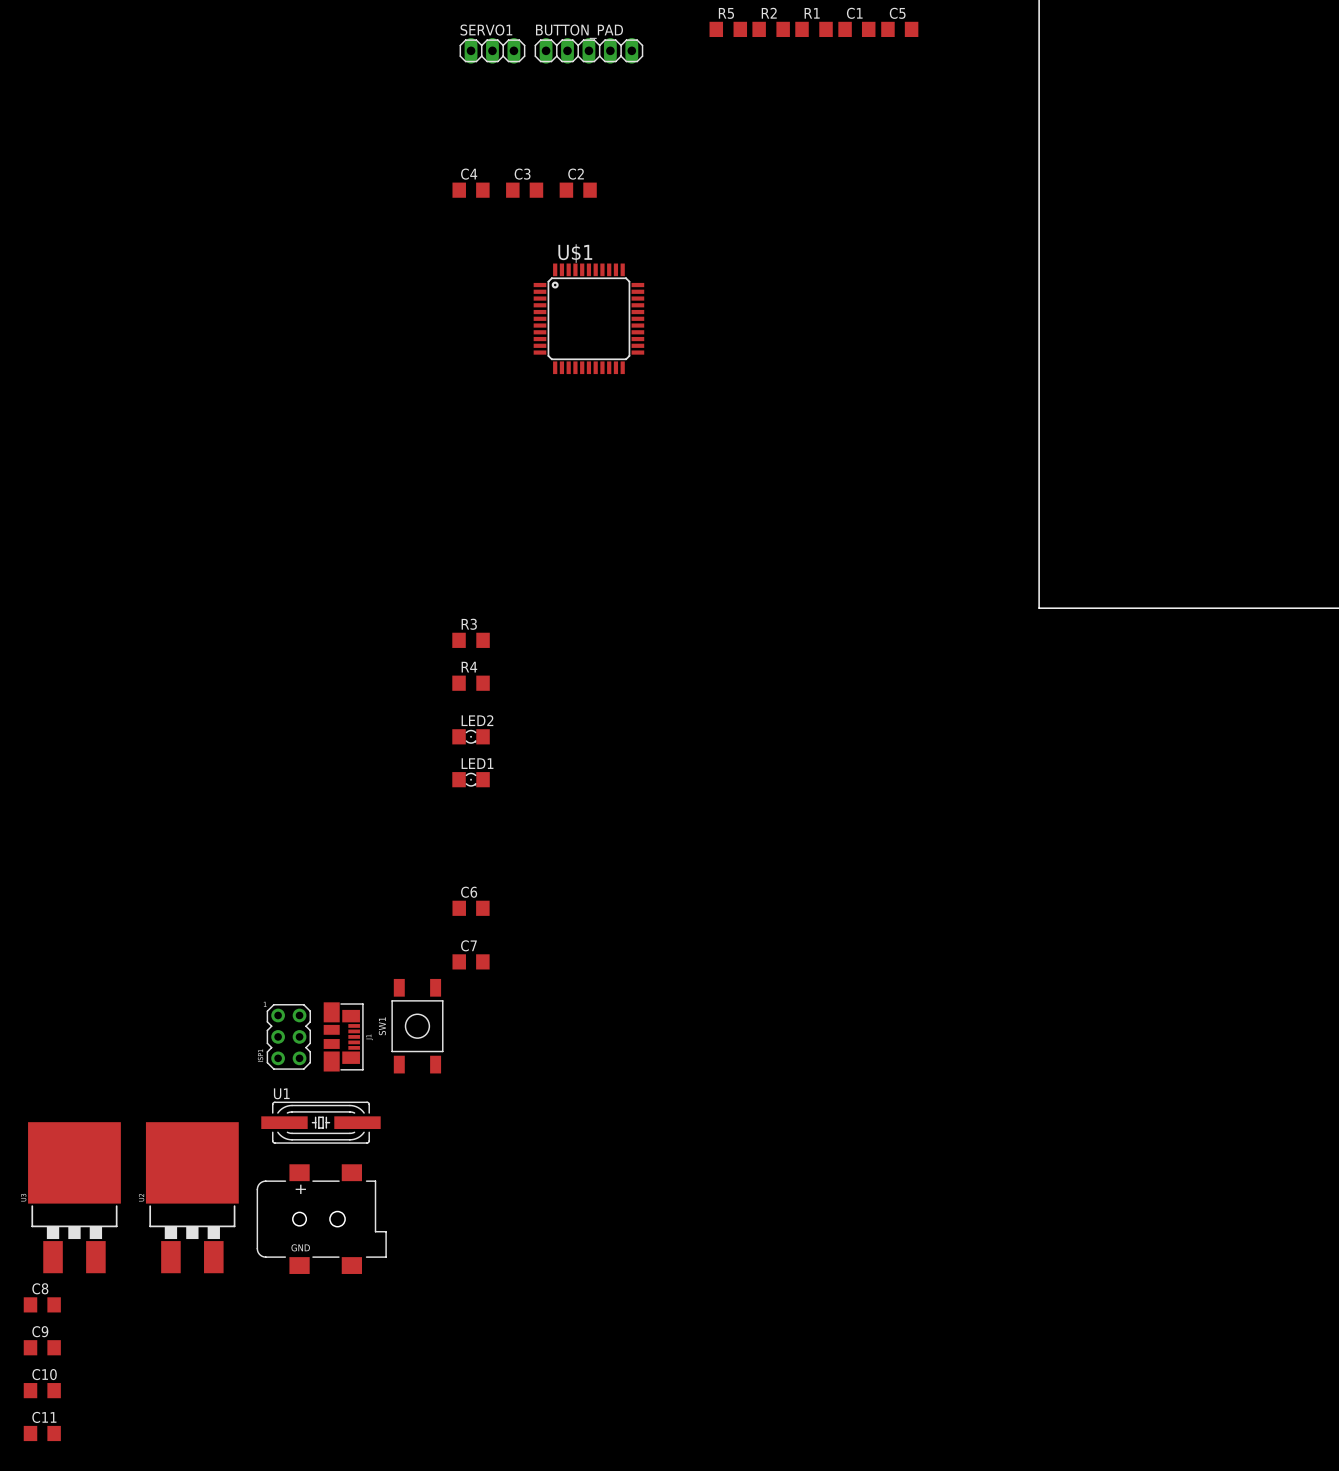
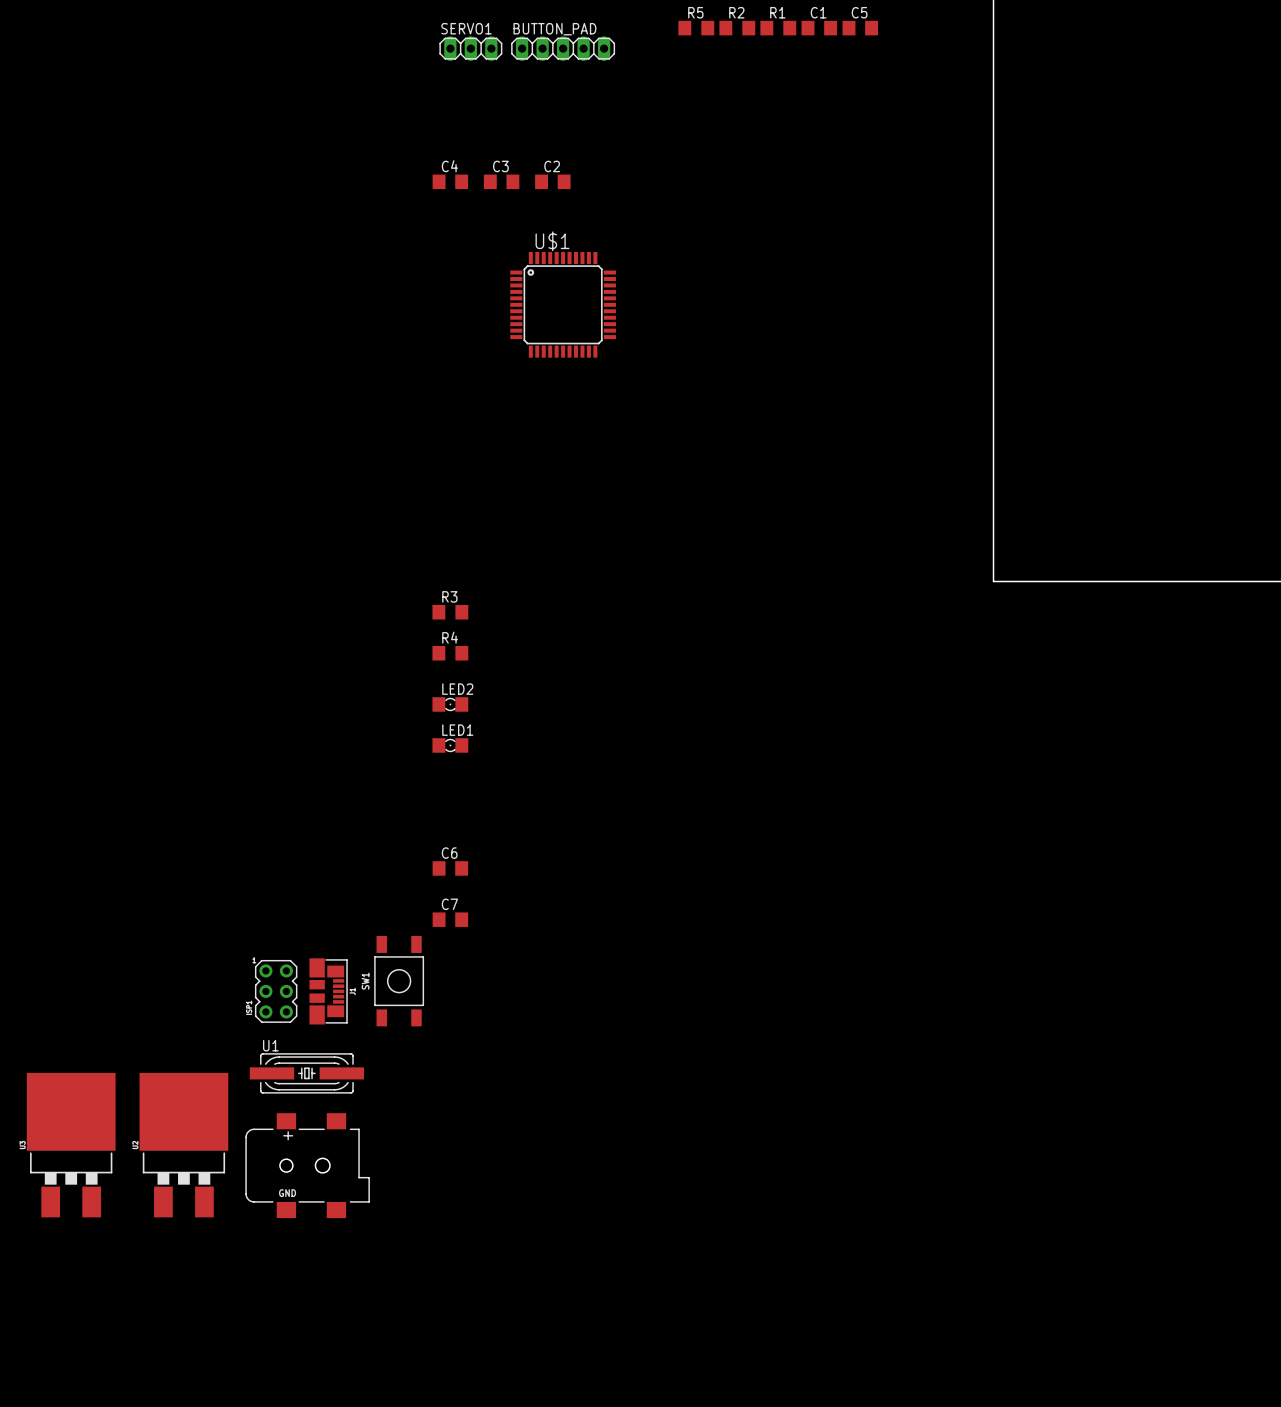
C8: (42, 1304) -> none
C9: (42, 1347) -> none
C10: (42, 1390) -> none
C11: (42, 1433) -> none

